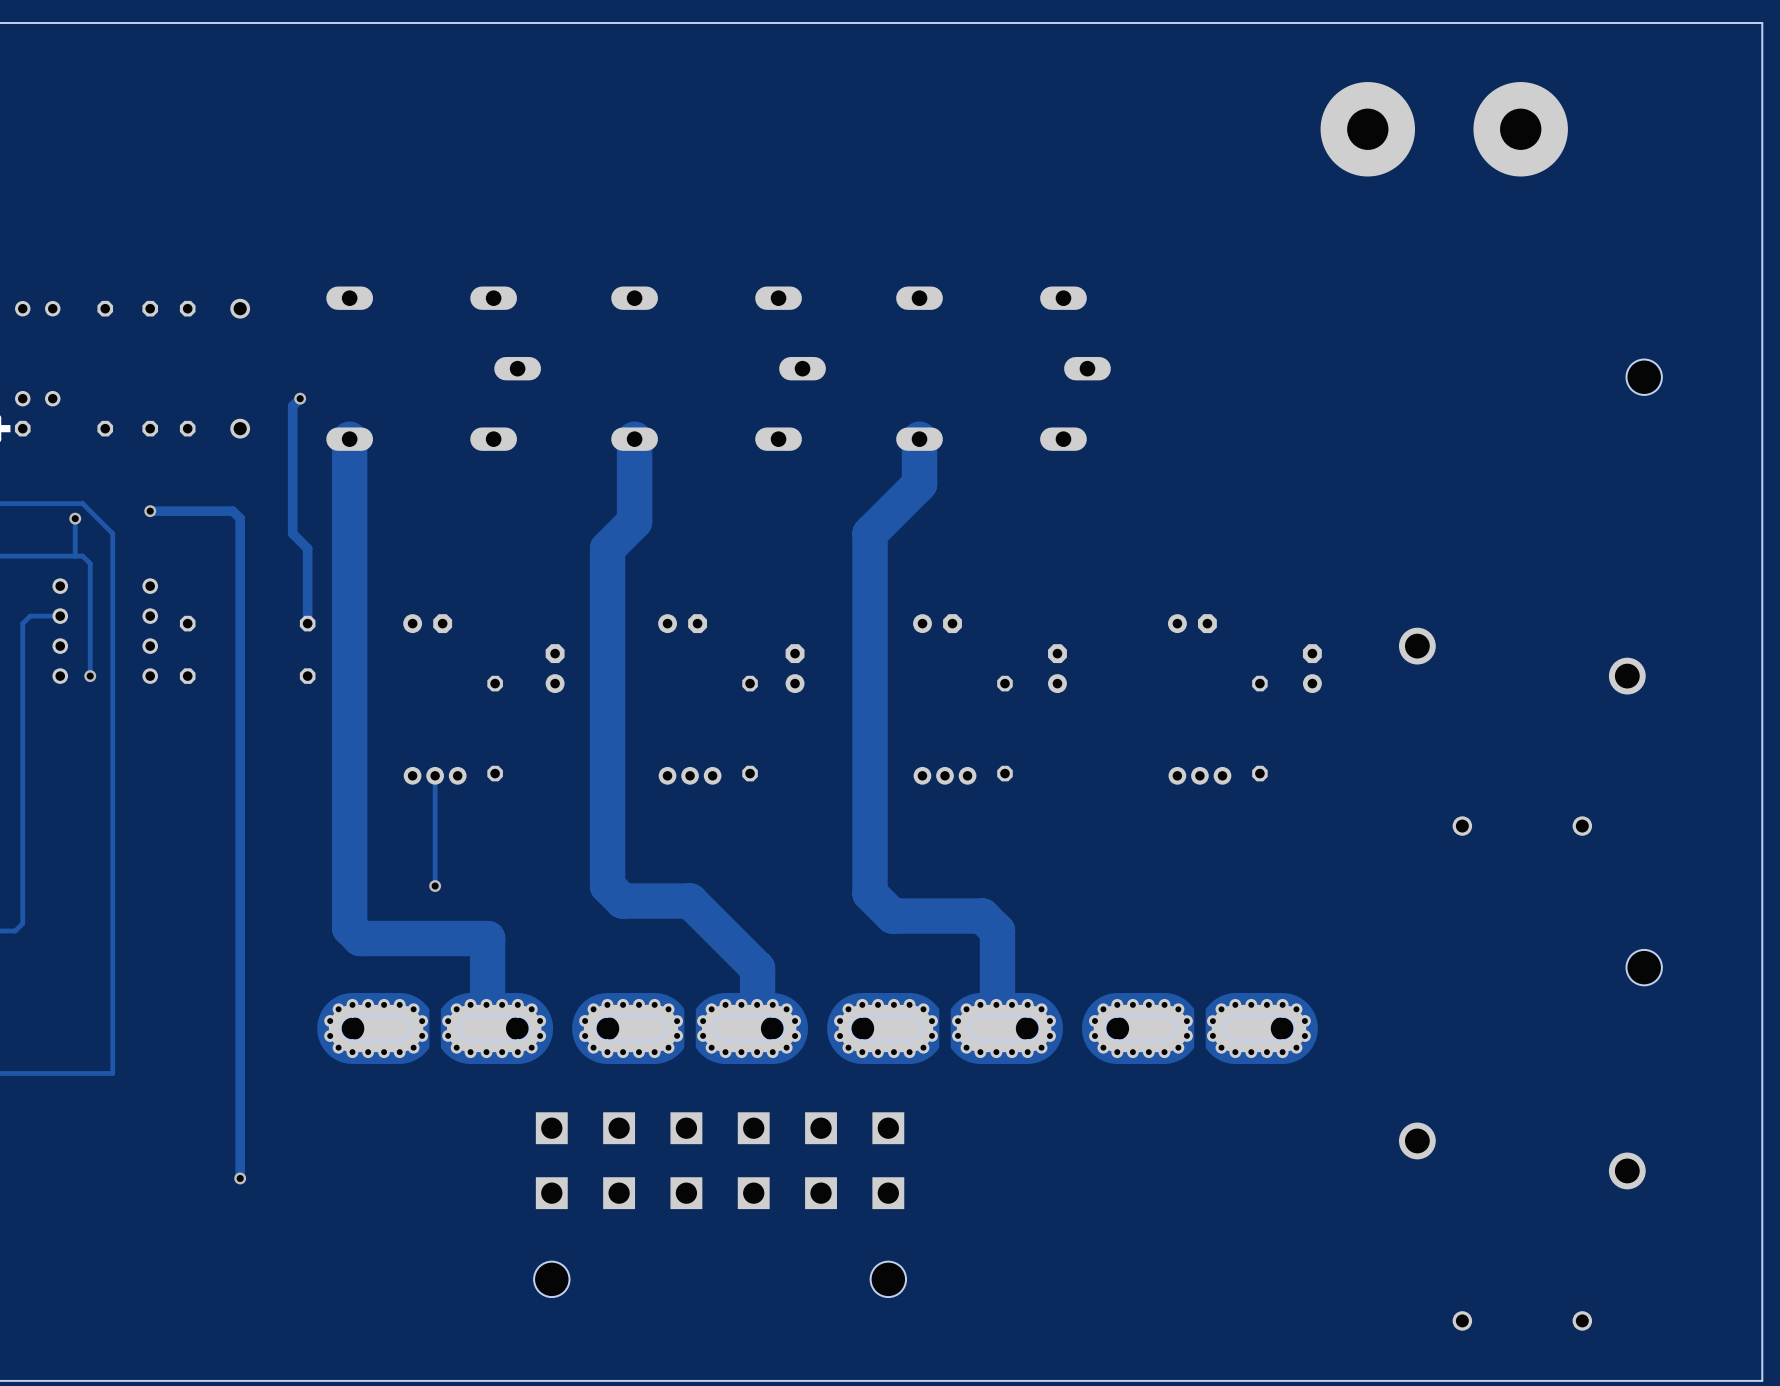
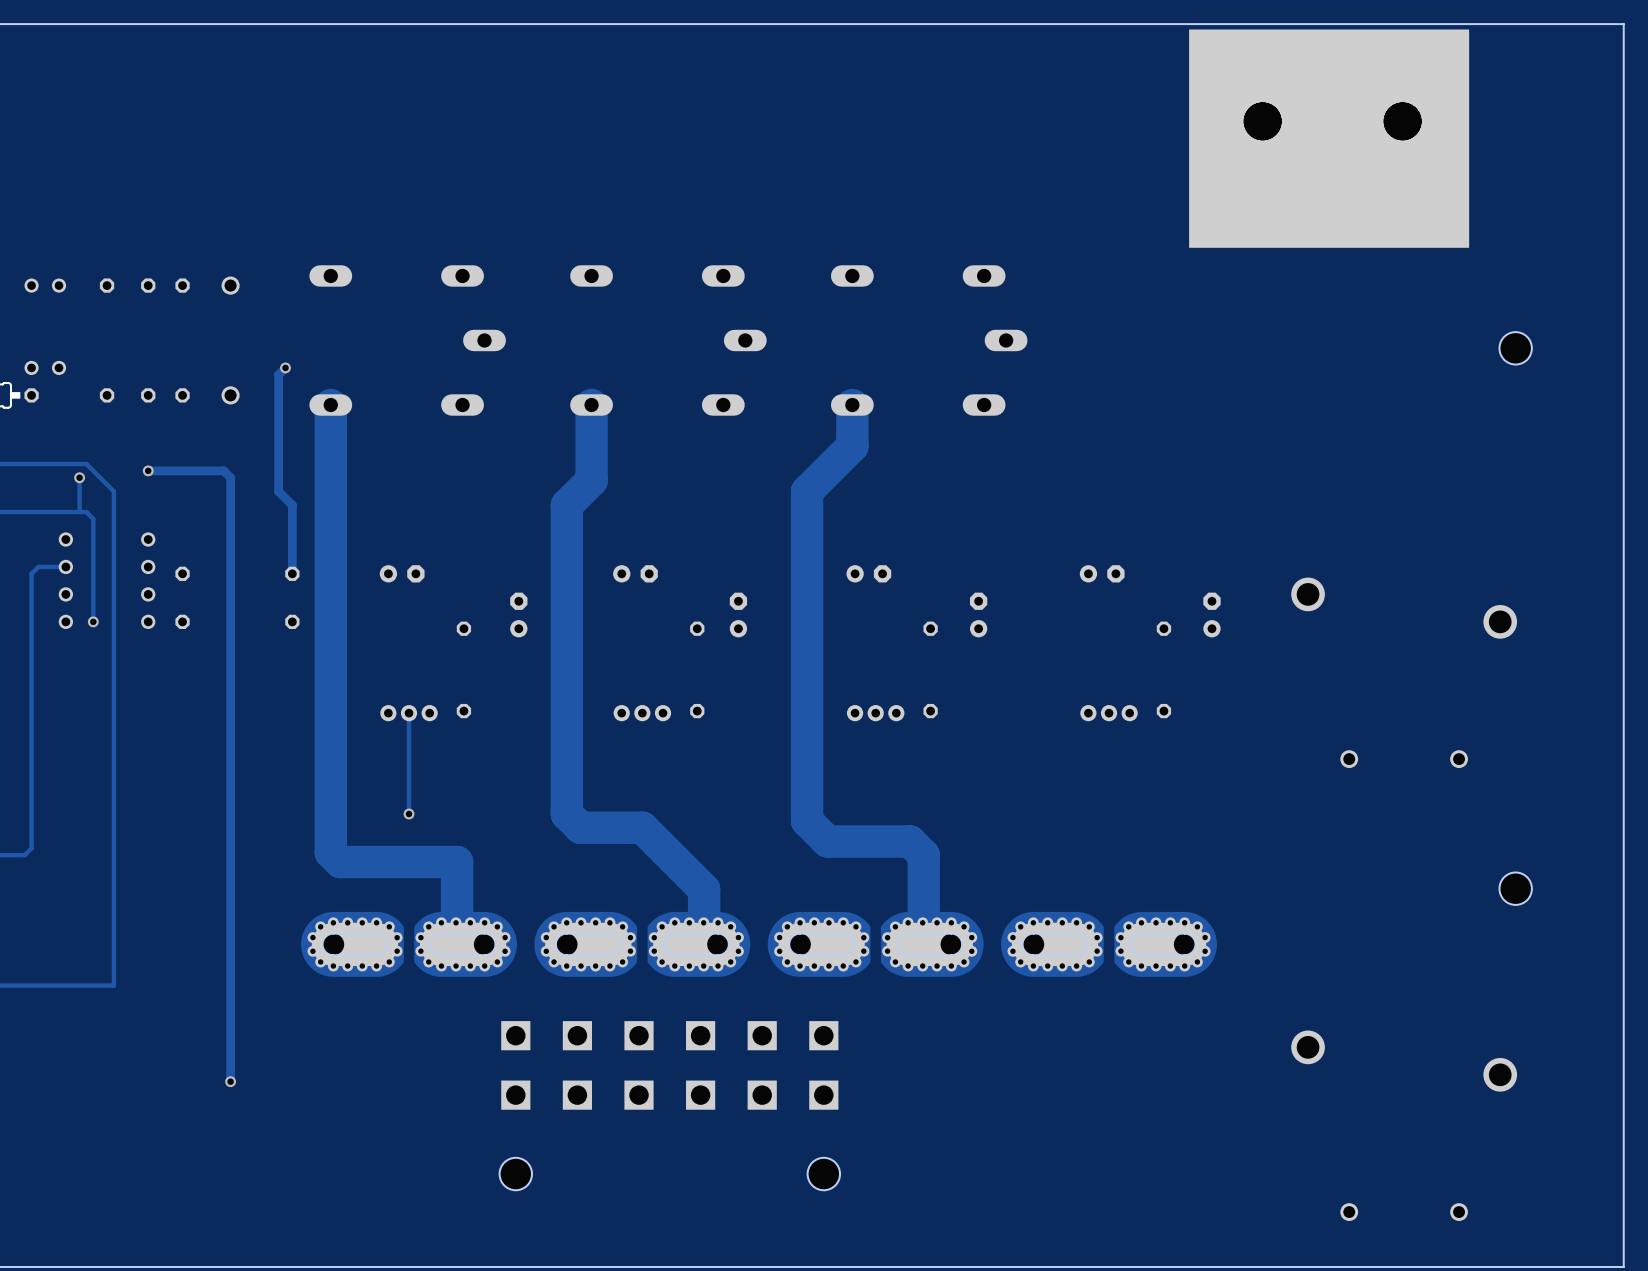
part: none -> (1329, 138)

